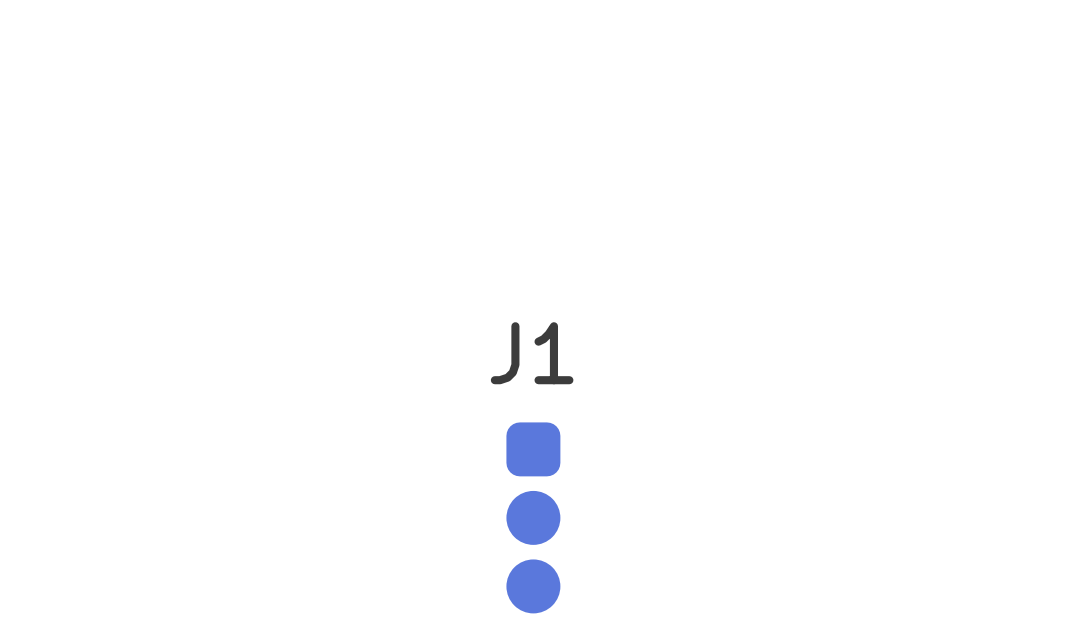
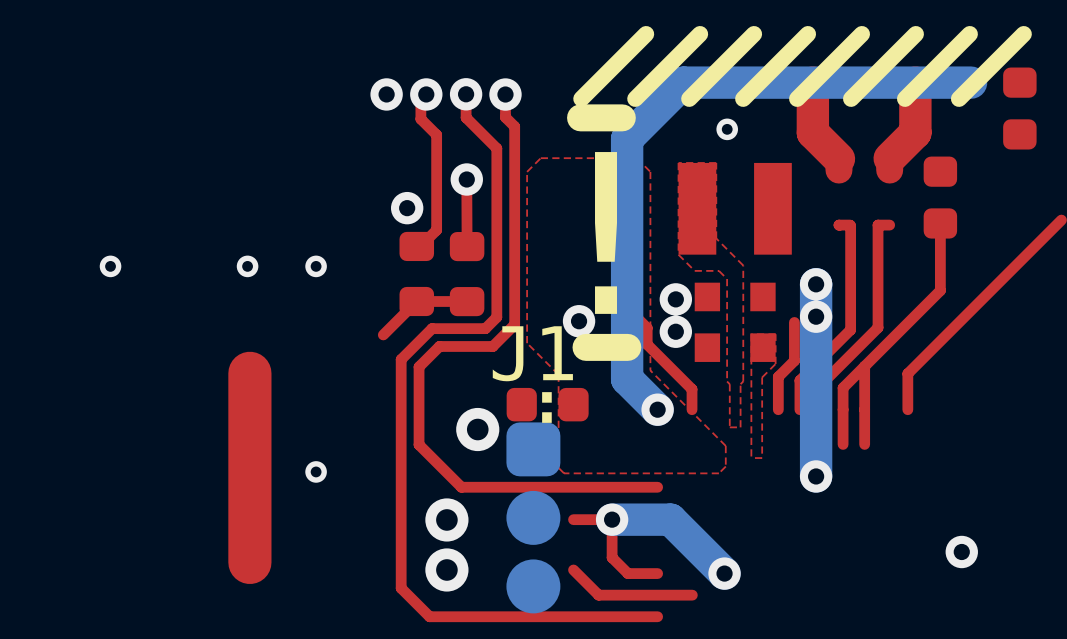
line: none -> (646, 34) (581, 98)
line: none -> (700, 34) (635, 98)
line: none -> (754, 34) (689, 98)
line: none -> (807, 34) (743, 98)
line: none -> (861, 34) (797, 98)
line: none -> (915, 34) (851, 98)
line: none -> (969, 34) (905, 98)
line: none -> (1023, 34) (959, 98)
top track: none -> (812, 82) (812, 132) (838, 158) (838, 170)
top track: none -> (915, 82) (915, 132) (889, 158) (889, 170)
bottom track: none -> (971, 82) (683, 82) (627, 138) (627, 379) (657, 409)
via: none -> (386, 94)
via: none -> (426, 94)
top track: none -> (466, 94) (466, 117) (496, 148) (496, 317) (485, 328) (432, 328) (401, 359) (401, 588) (429, 616) (657, 616)
via: none -> (466, 94)
top track: none -> (505, 94) (505, 117) (514, 126) (514, 324) (492, 346) (439, 346) (419, 366) (419, 444) (461, 487) (657, 487)
via: none -> (505, 94)
top track: none -> (426, 95) (420, 100) (420, 119) (436, 134) (436, 230) (420, 246) (416, 246)
part: none -> (1019, 108)
line: none -> (622, 117) (580, 117)
via: none -> (727, 129)
top zone outline: none -> (636, 158) (540, 158) (527, 171) (527, 343) (558, 374) (558, 467) (564, 473) (718, 473) (725, 466) (725, 445) (650, 370) (650, 171) (636, 158)
top zone outline: none -> (716, 163) (716, 238) (743, 265) (743, 381) (740, 384) (740, 427) (729, 427) (729, 384) (727, 381) (727, 278) (718, 270) (694, 270) (678, 254) (678, 163) (716, 163)
via: none -> (466, 179)
top track: none -> (466, 180) (467, 246)
part: none -> (940, 197)
via: none -> (407, 208)
part: none -> (735, 208)
top track: none -> (1061, 220) (907, 373) (907, 409)
top track: none -> (940, 223) (940, 290) (843, 387) (843, 444)
top track: none -> (850, 225) (838, 225)
top track: none -> (850, 225) (850, 329) (799, 380) (799, 409)
top track: none -> (889, 225) (878, 225) (878, 327) (821, 384) (821, 409)
text: none -> ! (606, 232)
via: none -> (110, 266)
via: none -> (247, 266)
via: none -> (316, 266)
part: none -> (416, 273)
part: none -> (467, 274)
via: none -> (816, 284)
top track: none -> (615, 295) (647, 327) (647, 344) (692, 389) (692, 409)
part: none -> (735, 296)
via: none -> (675, 299)
top track: none -> (466, 301) (416, 301) (383, 334)
bottom track: none -> (816, 316) (816, 284) (816, 476)
via: none -> (816, 316)
via: none -> (579, 321)
top track: none -> (794, 322) (794, 360) (778, 376) (778, 409)
via: none -> (675, 331)
top zone outline: none -> (775, 334) (775, 363) (762, 377) (762, 458) (751, 458) (751, 334) (775, 334)
line: none -> (627, 347) (586, 347)
part: none -> (735, 347)
top track: none -> (864, 366) (864, 444)
top track: none -> (249, 373) (249, 562)
part: none -> (547, 404)
text: none -> : (546, 407)
via: none -> (657, 409)
via: none -> (477, 429)
via: none -> (316, 471)
via: none -> (816, 476)
via: none -> (446, 519)
top track: none -> (573, 519) (612, 519) (612, 557) (627, 573) (657, 573)
bottom track: none -> (612, 519) (670, 519) (724, 573)
via: none -> (612, 519)
via: none -> (961, 551)
via: none -> (446, 569)
top track: none -> (573, 569) (598, 595) (692, 595)
via: none -> (724, 573)

